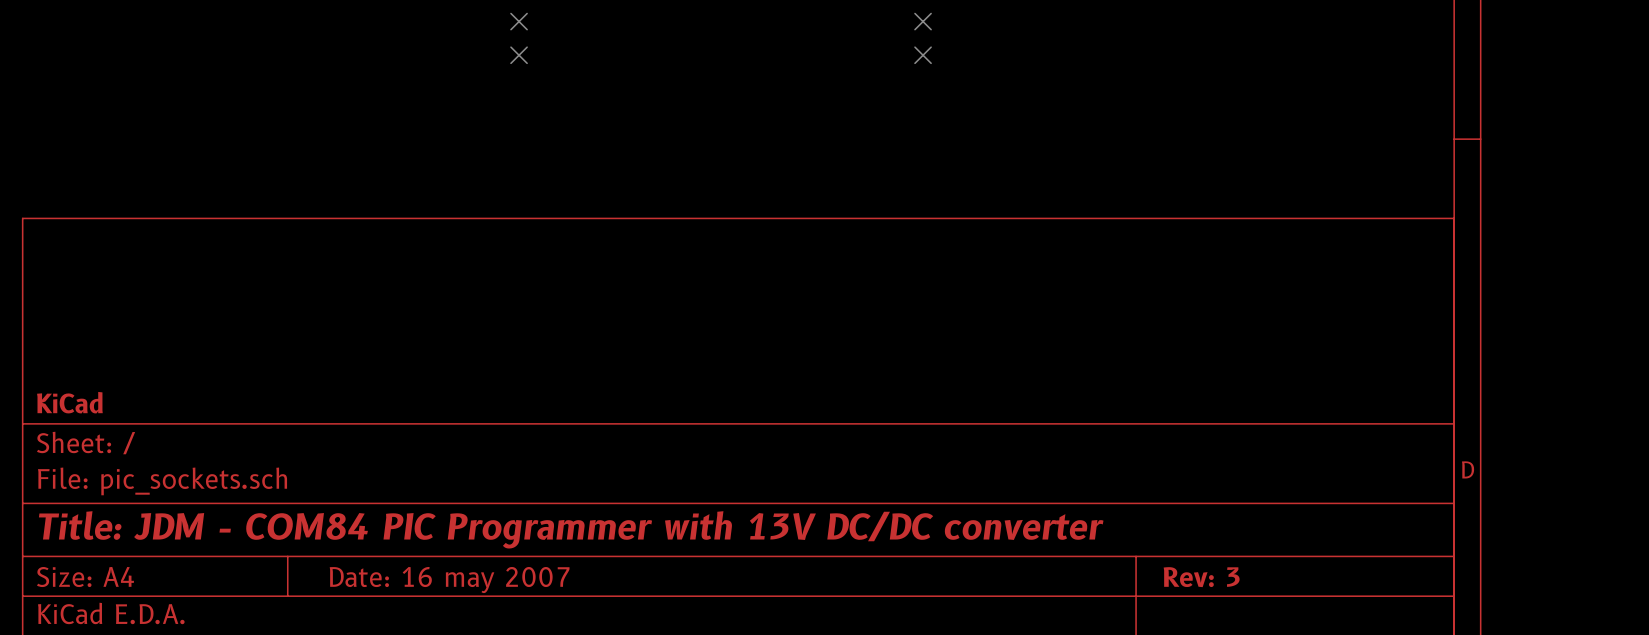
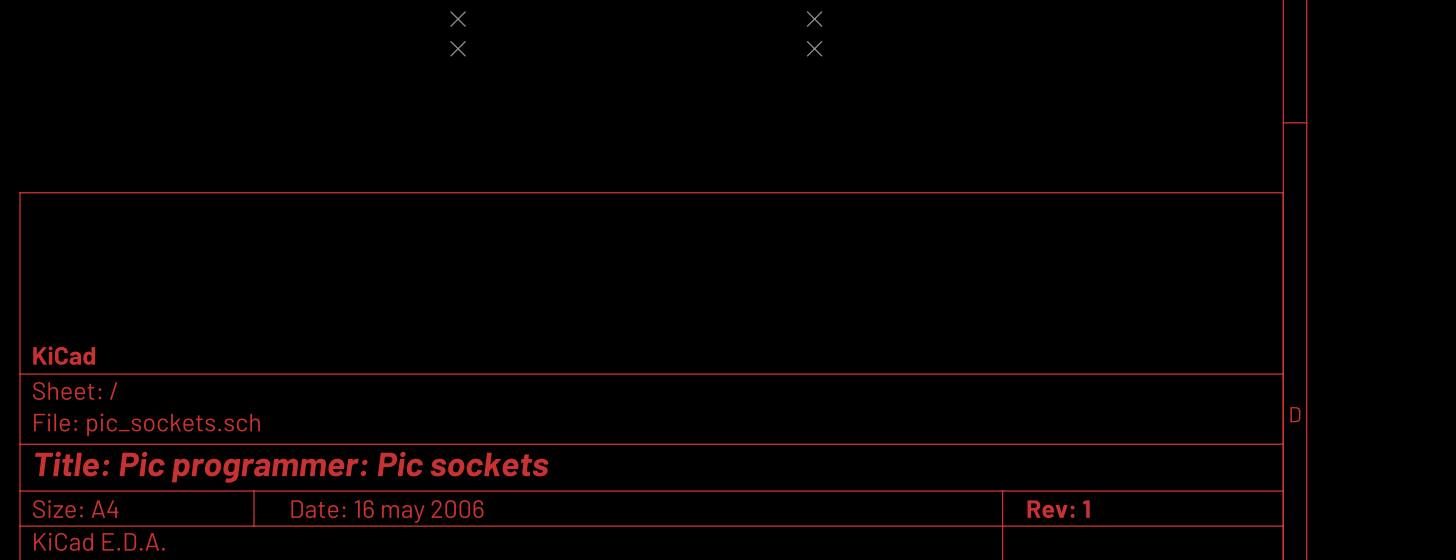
title block: Title: JDM - COM84 PIC Programmer with 13V DC/DC converter (571, 529) -> Title: Pic programmer: Pic sockets (291, 467)
title block: Rev: 3 (1201, 577) -> Rev: 1 (1058, 509)
title block: Date: 16 may 2007 (449, 580) -> Date: 16 may 2006 (387, 511)

